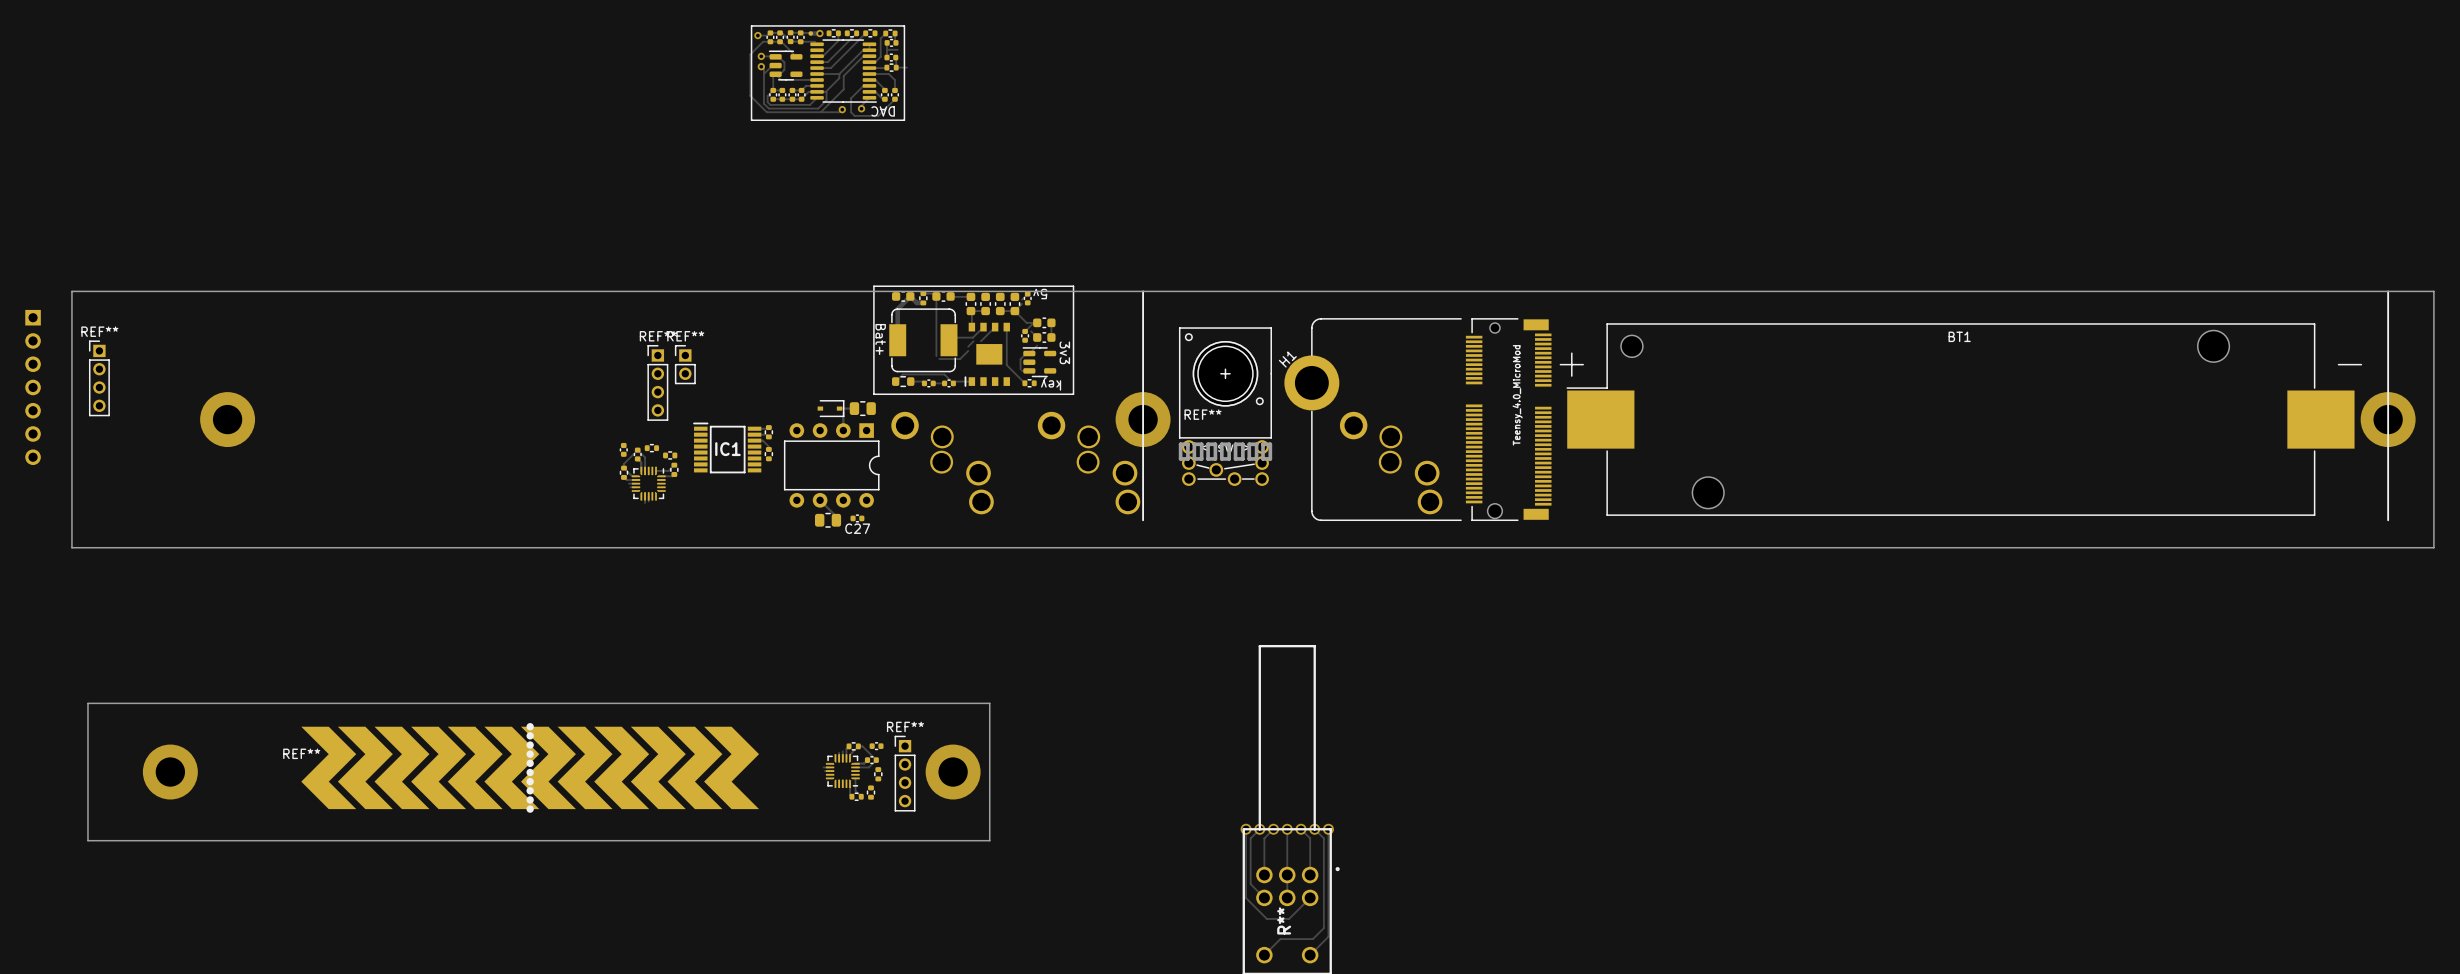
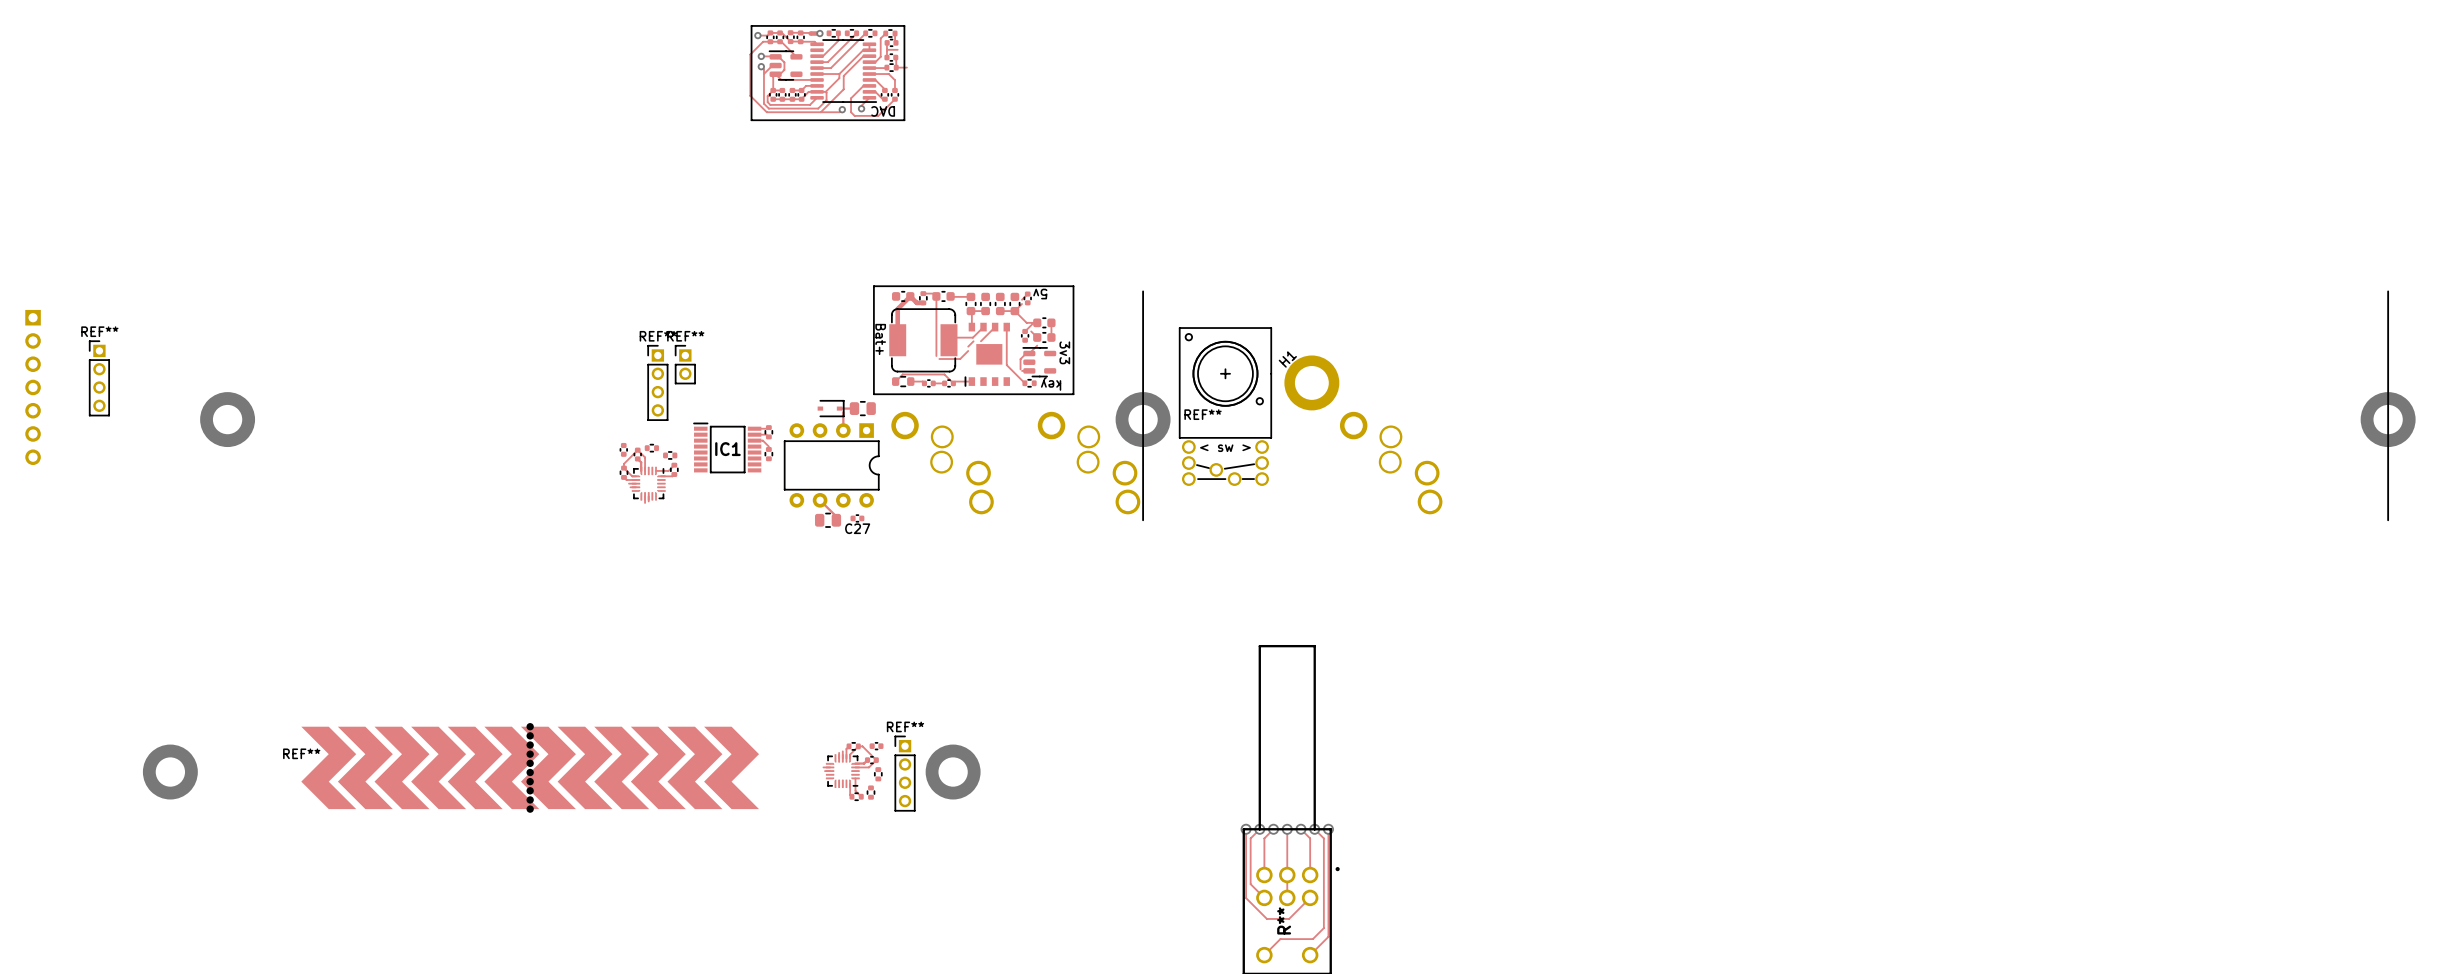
board edge: (71, 291) (2433, 291) (2433, 547) (71, 547) (71, 291) -> none
part: (1431, 419) -> none
BT1: (1960, 419) -> none
board edge: (1180, 444) (1187, 444) (1187, 458) (1180, 458) (1180, 444) -> none
board edge: (1194, 444) (1201, 444) (1201, 458) (1194, 458) (1194, 444) -> none
board edge: (1208, 444) (1215, 444) (1215, 458) (1208, 458) (1208, 444) -> none
board edge: (1221, 444) (1229, 444) (1229, 458) (1221, 458) (1221, 444) -> none
board edge: (1235, 444) (1242, 444) (1242, 458) (1235, 458) (1235, 444) -> none
board edge: (1249, 444) (1256, 444) (1256, 458) (1249, 458) (1249, 444) -> none
board edge: (1263, 444) (1270, 444) (1270, 458) (1263, 458) (1263, 444) -> none
board edge: (87, 703) (87, 840) (989, 840) (989, 703) (87, 703) -> none

